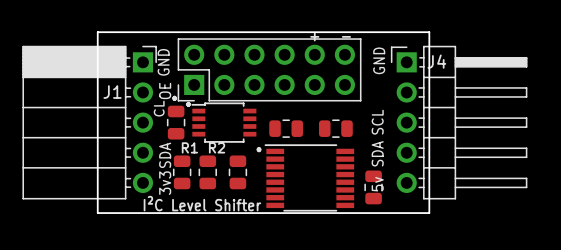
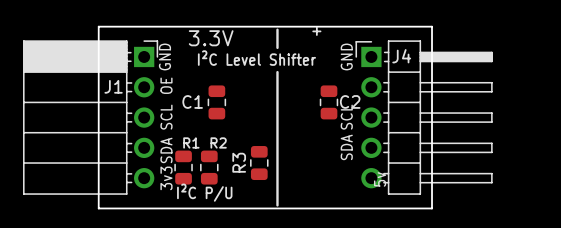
line: none -> (277, 29) (277, 47)
text: - (346, 36) -> none
text: none -> 3.3V (211, 38)
text position: GND (379, 60) -> GND (346, 56)
part: (269, 69) -> none
line: none -> (277, 72) (277, 205)
text: . (174, 98) -> none
text: . (188, 104) -> none
C1: none -> (216, 102)
C2: none -> (328, 102)
text: CL (159, 108) -> SCL (166, 117)
part: (176, 122) -> none
part: (223, 122) -> none
text position: SCL (377, 122) -> SCL (346, 117)
J4 position: (459, 122) -> (424, 117)
part: (286, 128) -> none
part: (335, 128) -> none
text: . (259, 149) -> none
text position: SDA (377, 153) -> SDA (346, 147)
R3: none -> (259, 163)
part: (237, 172) -> none
part: (309, 177) -> none
part: (373, 187) -> none
text: none -> I²C P/U (204, 192)
text position: I²C Level Shifter (202, 203) -> I²C Level Shifter (256, 58)

